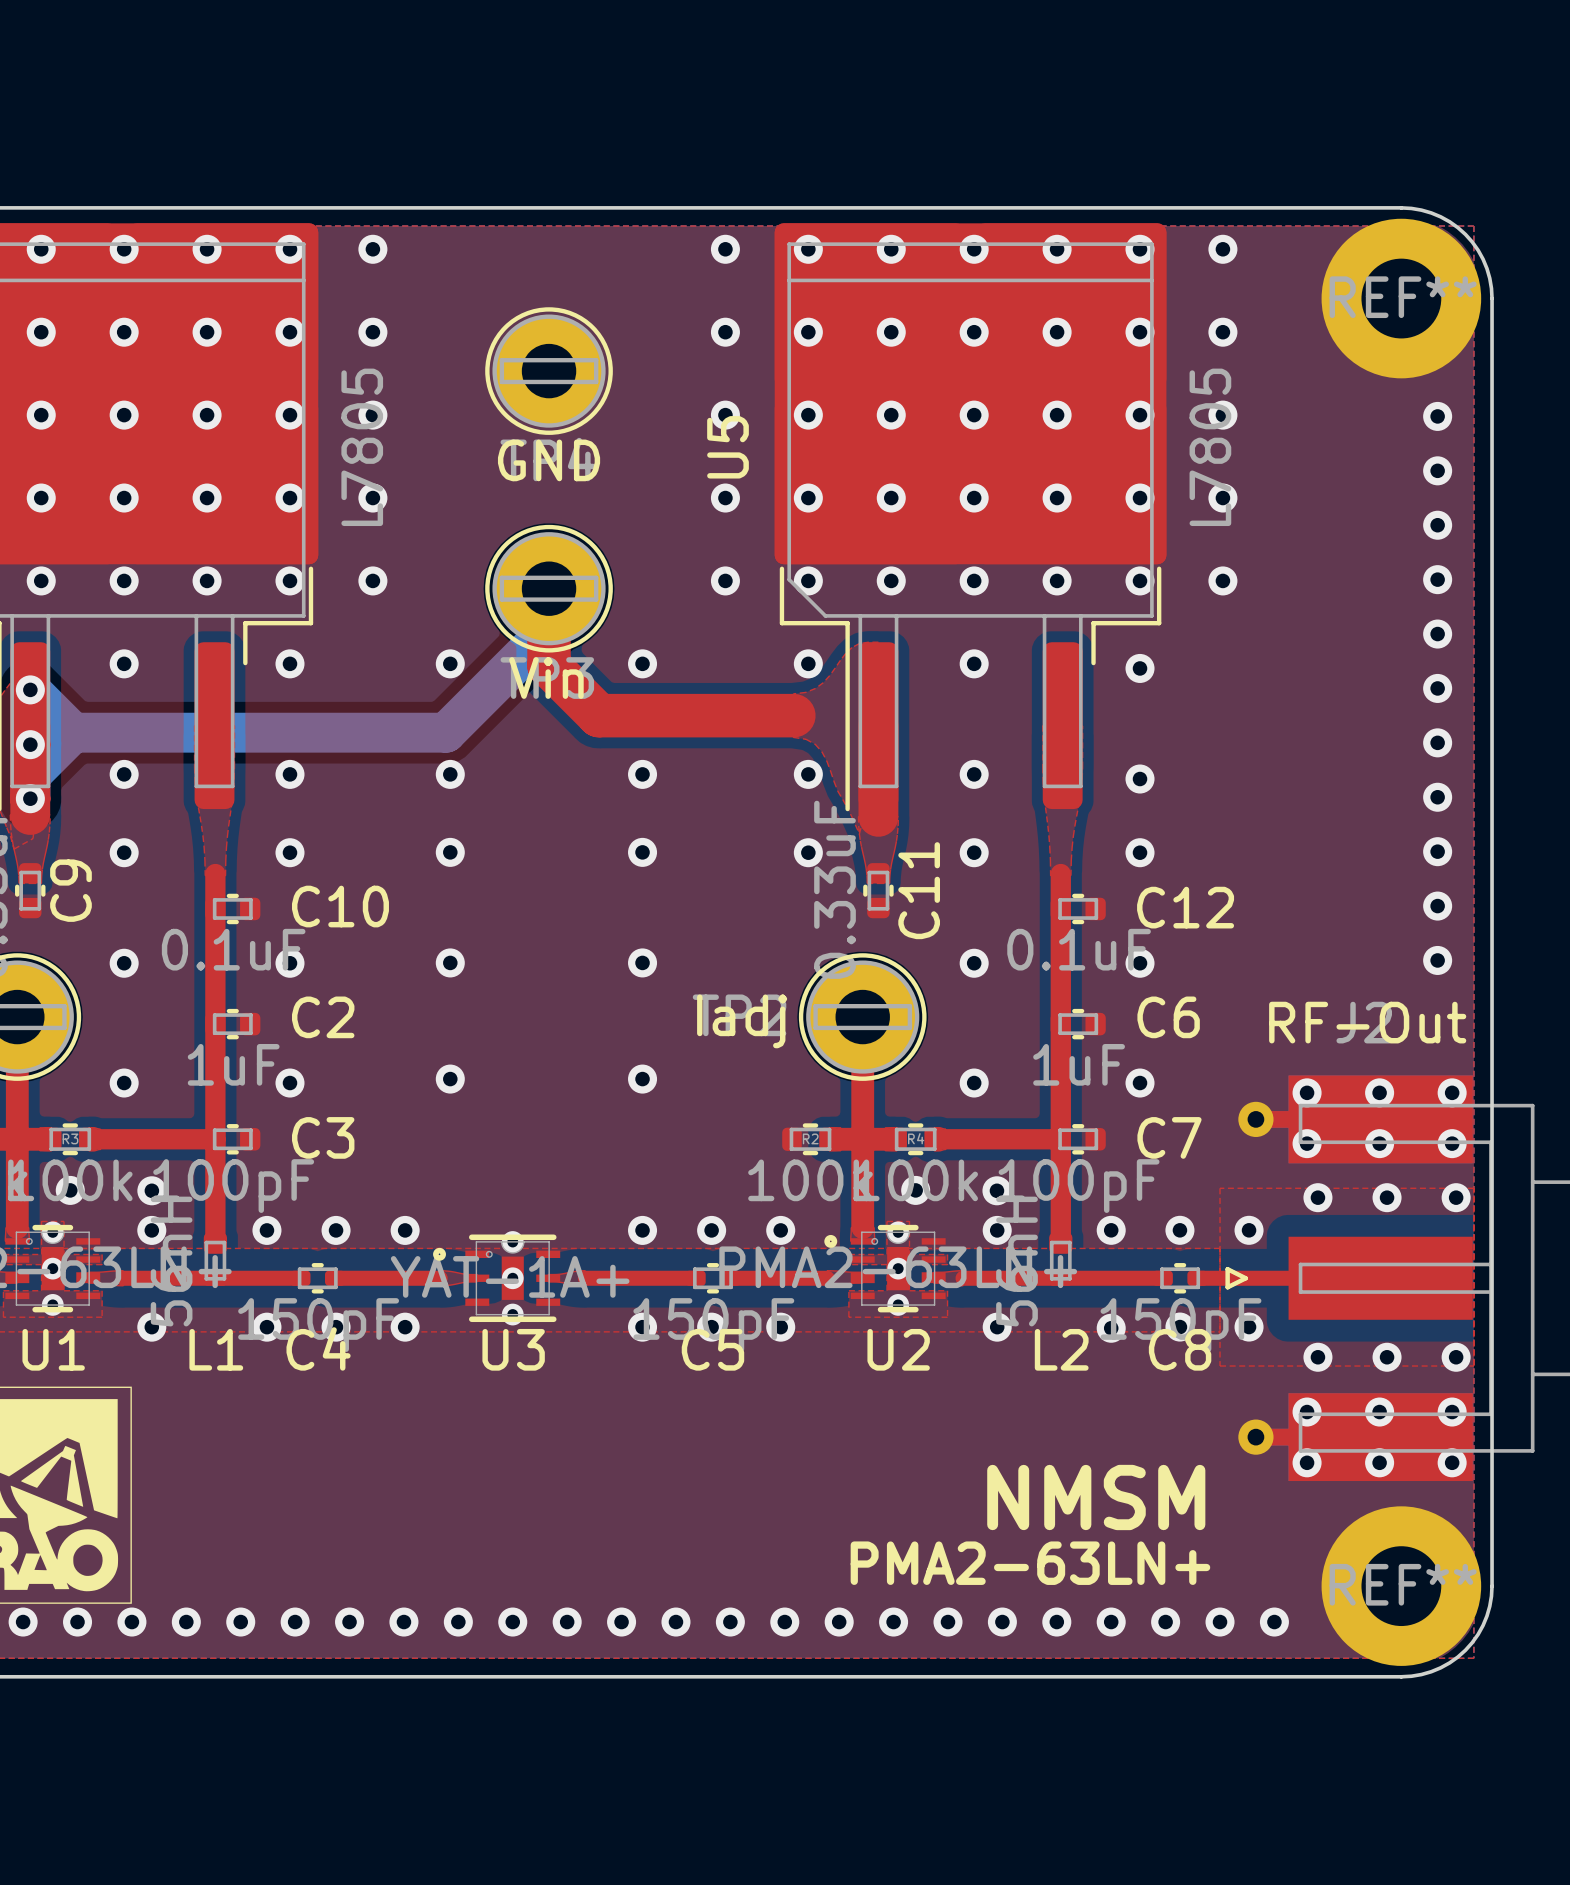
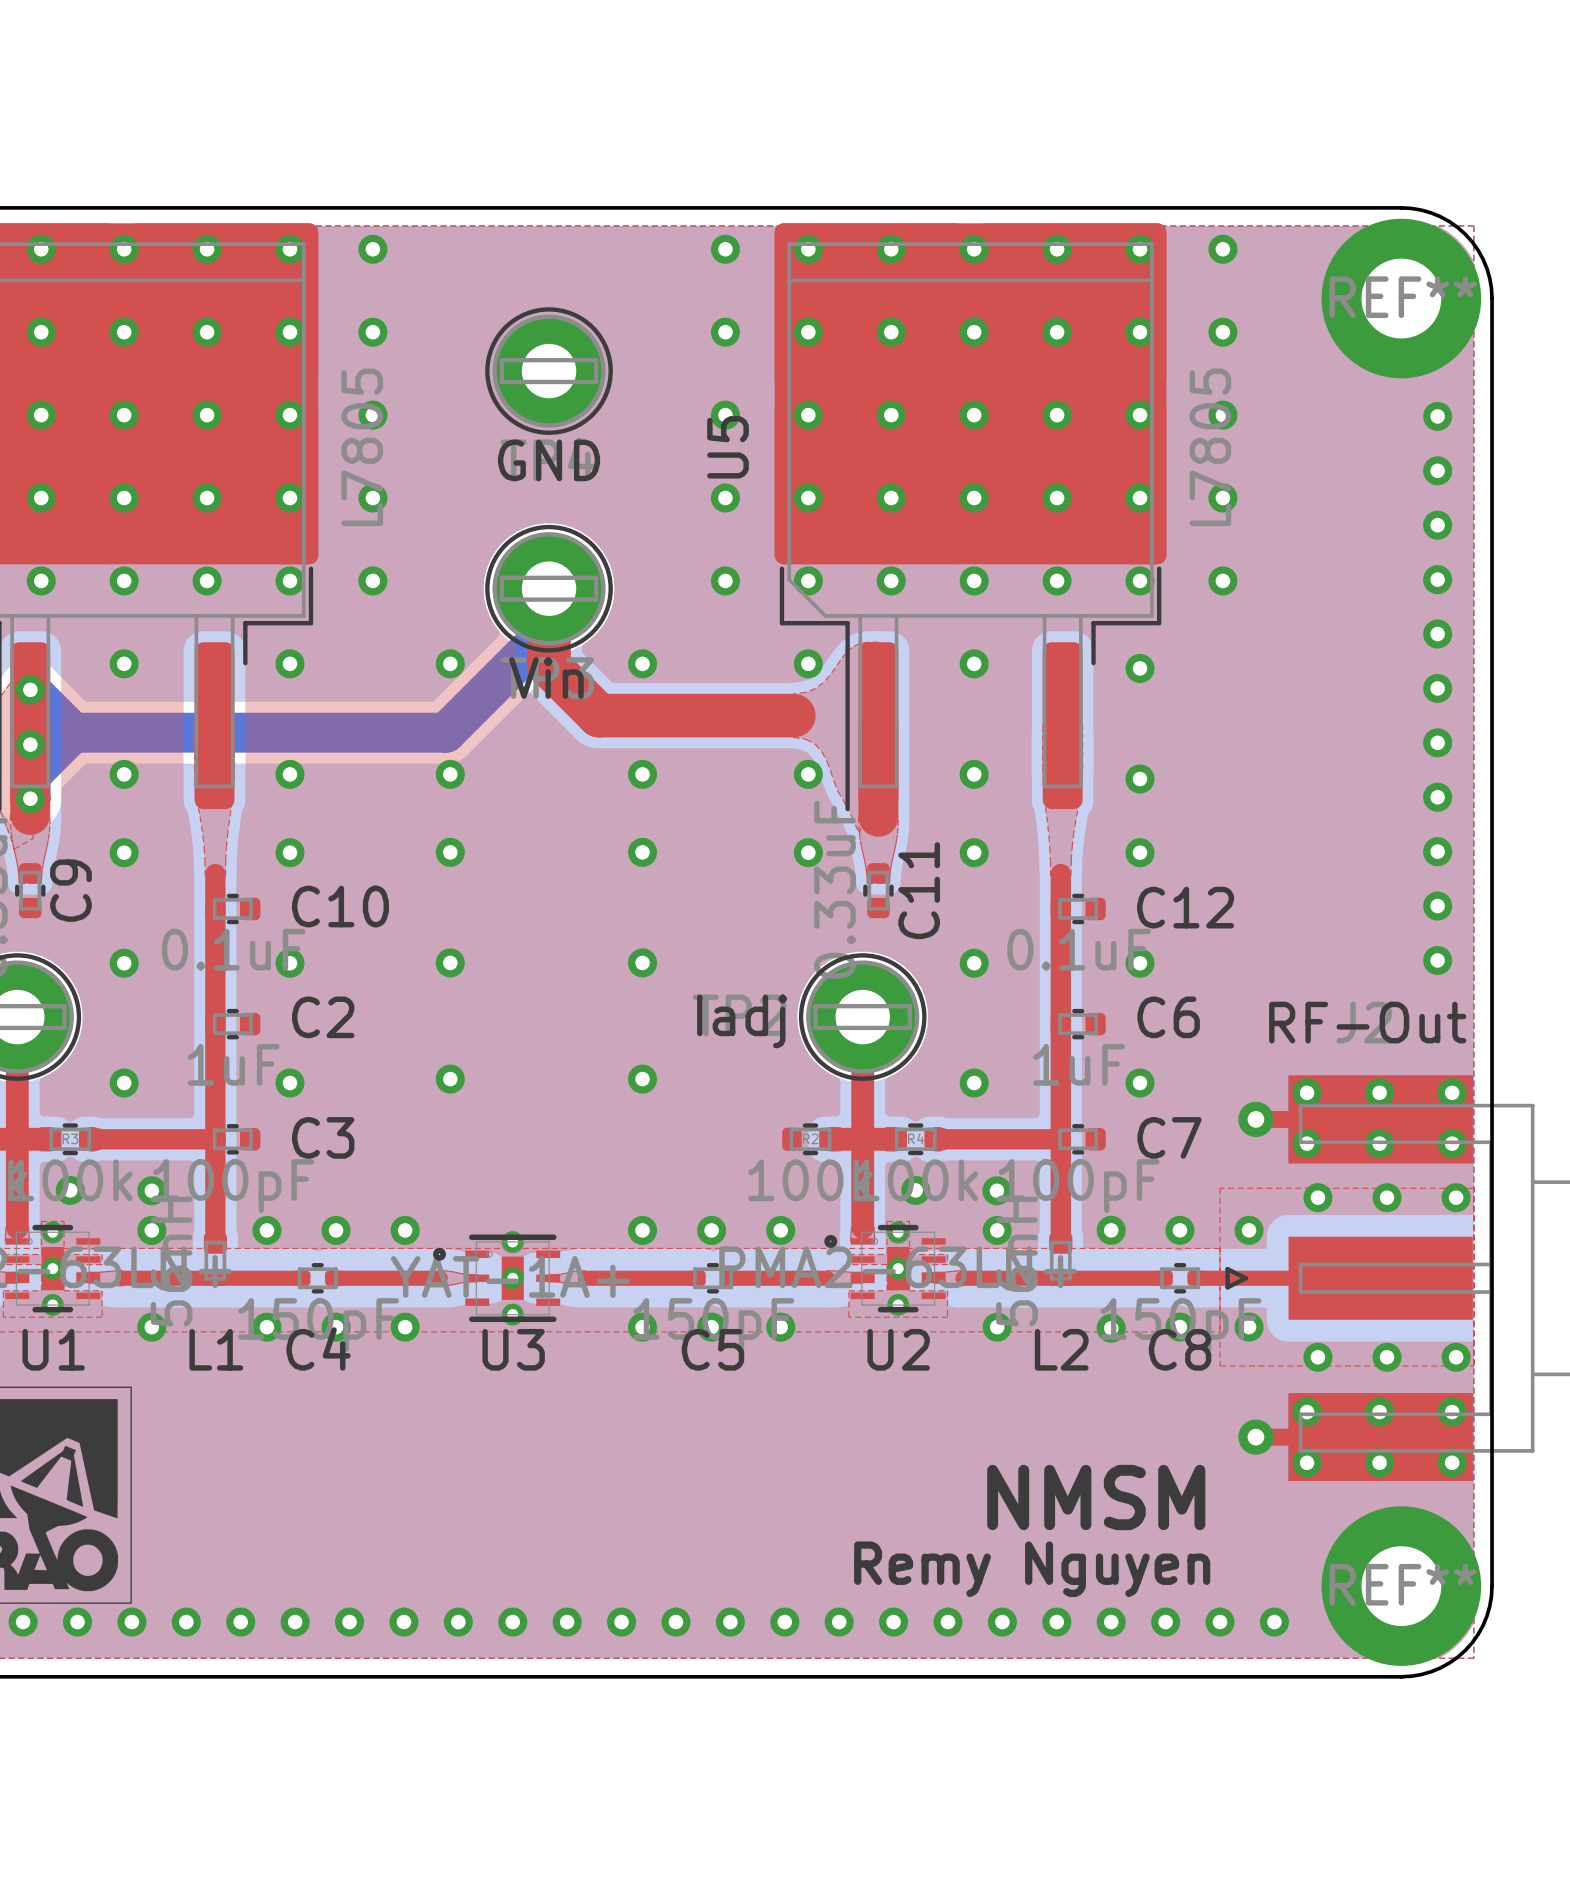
text: PMA2-63LN+ (1030, 1563) -> Remy Nguyen (1032, 1569)

